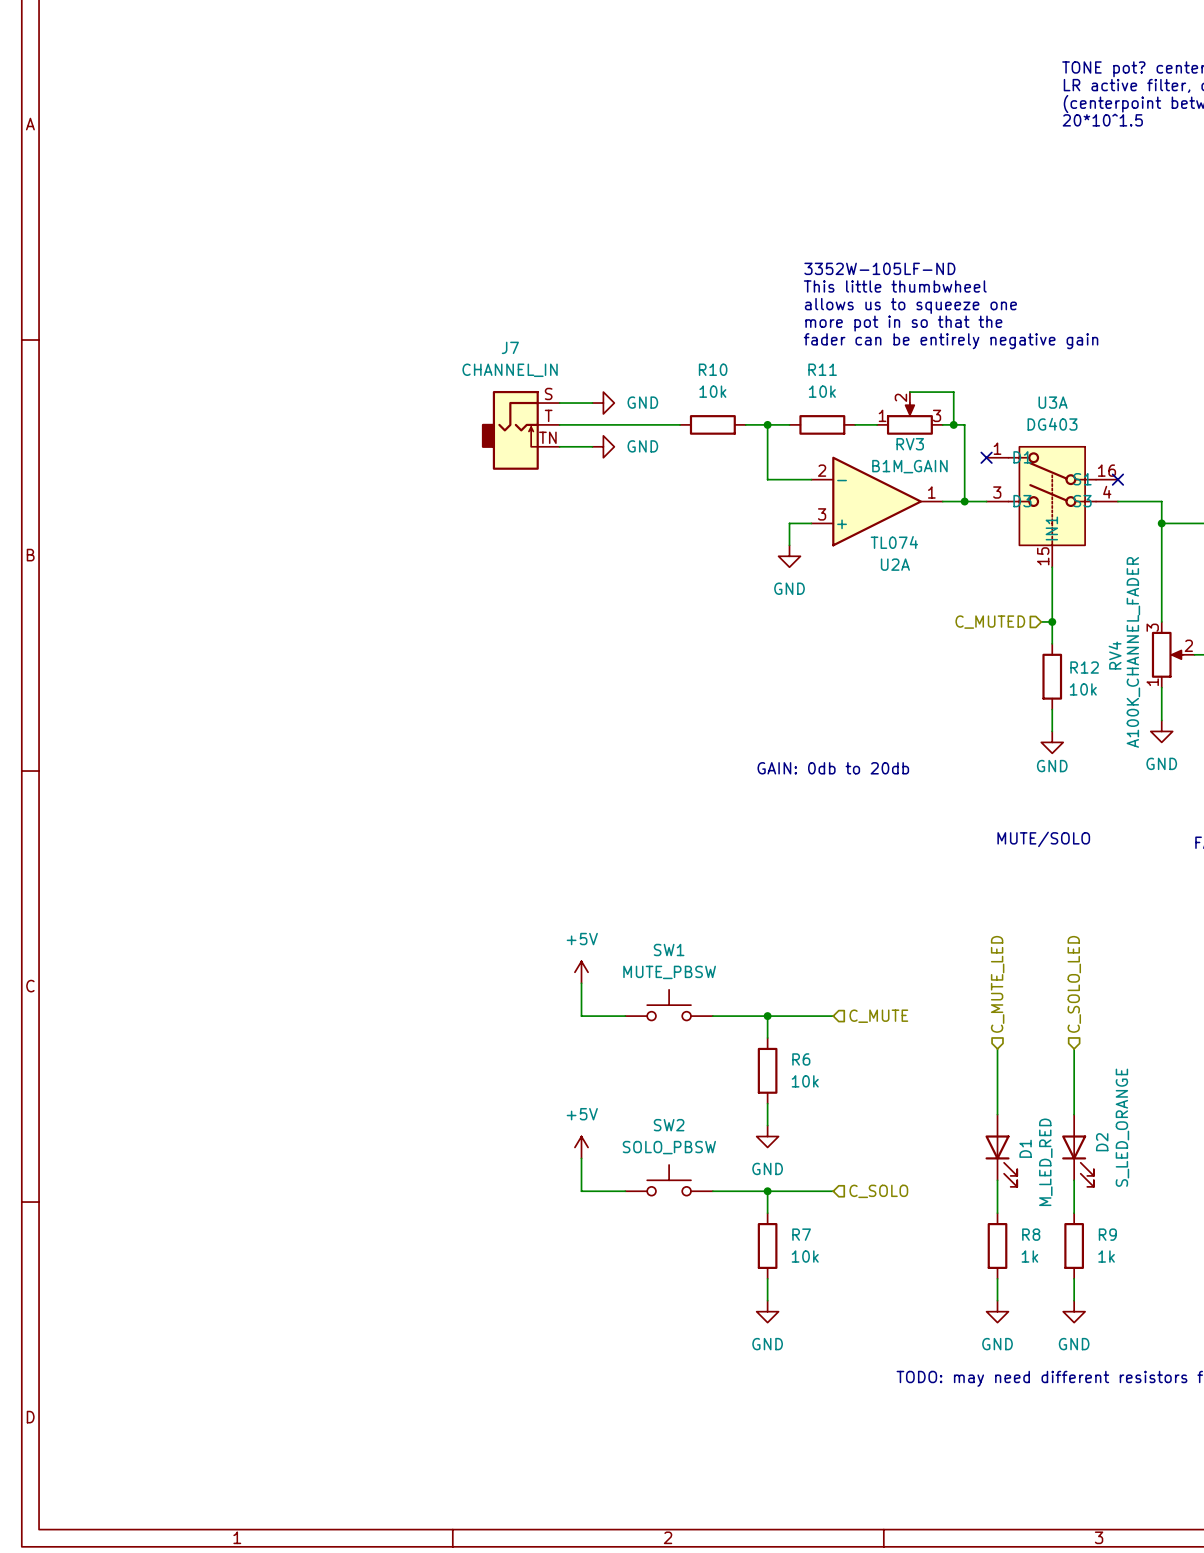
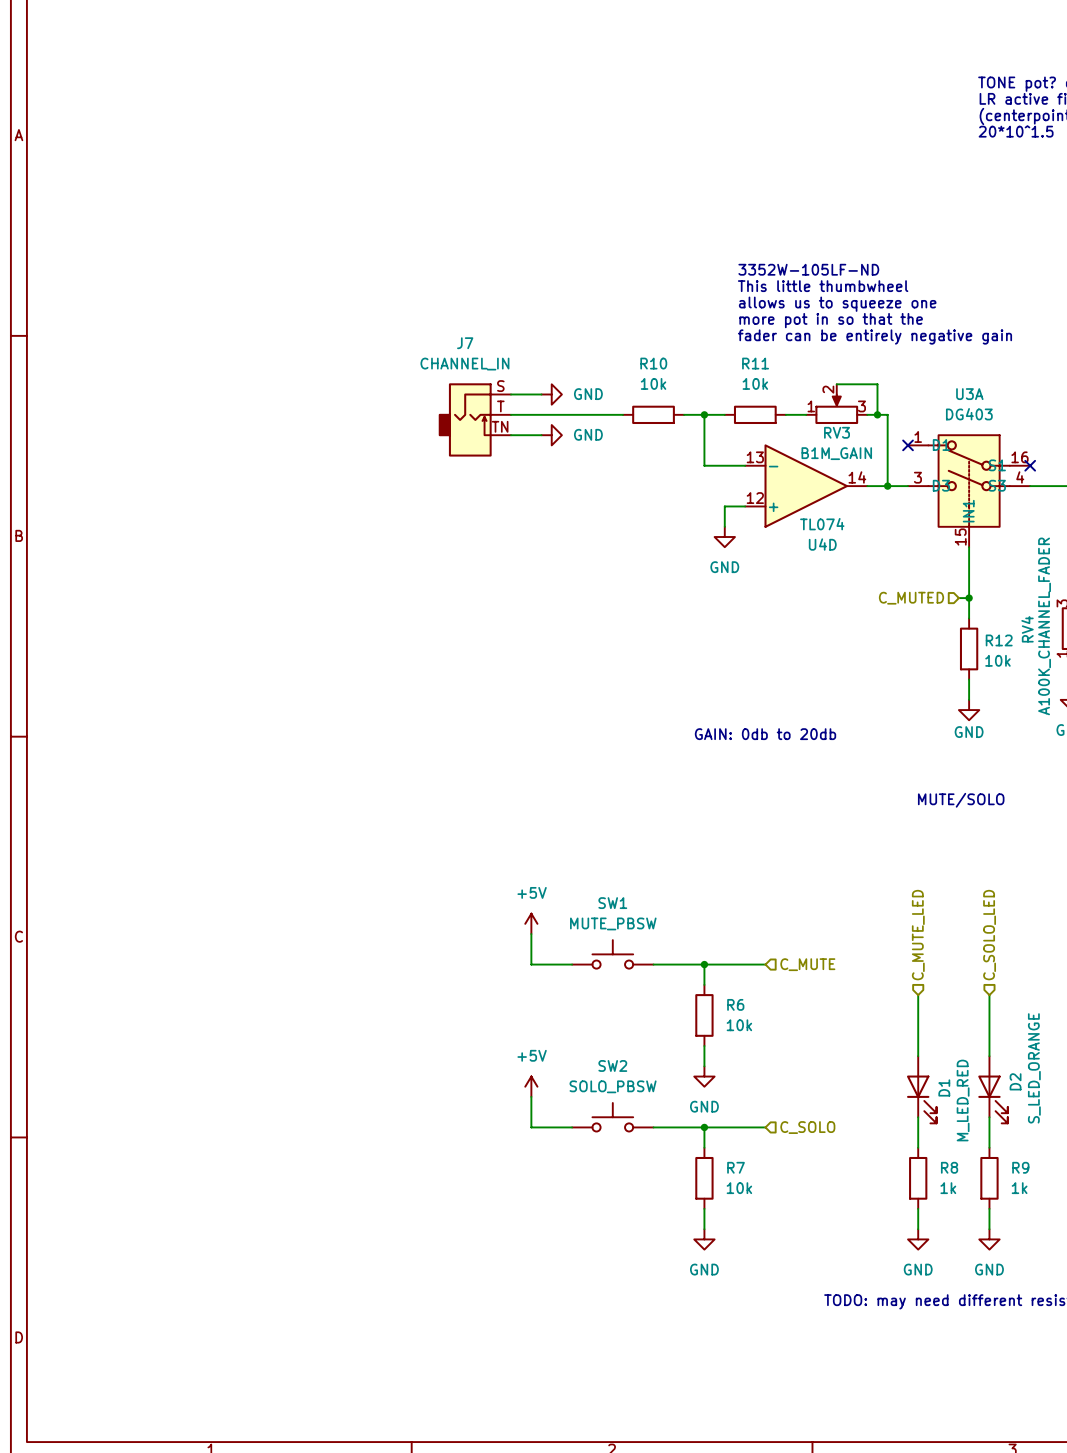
U2A pin number: 2 (822, 470) -> 13 (755, 457)
U2A pin number: 1 (931, 492) -> 14 (857, 477)
U2A pin number: 3 (822, 514) -> 12 (755, 498)
U2A name: U2A (895, 564) -> U4D (822, 544)

